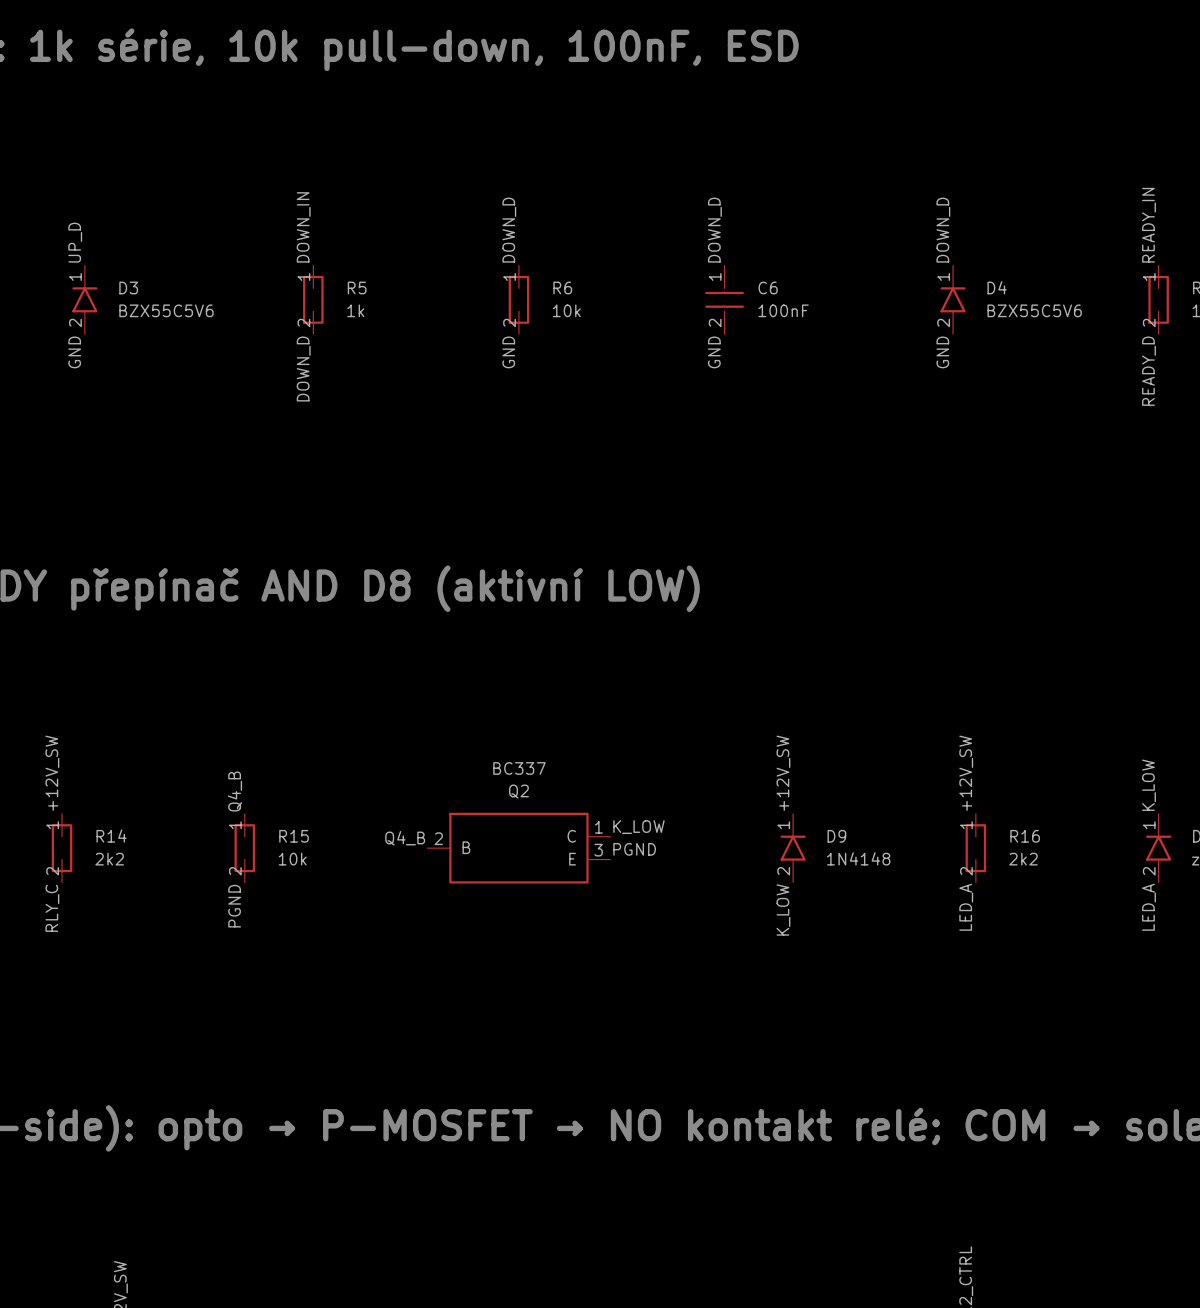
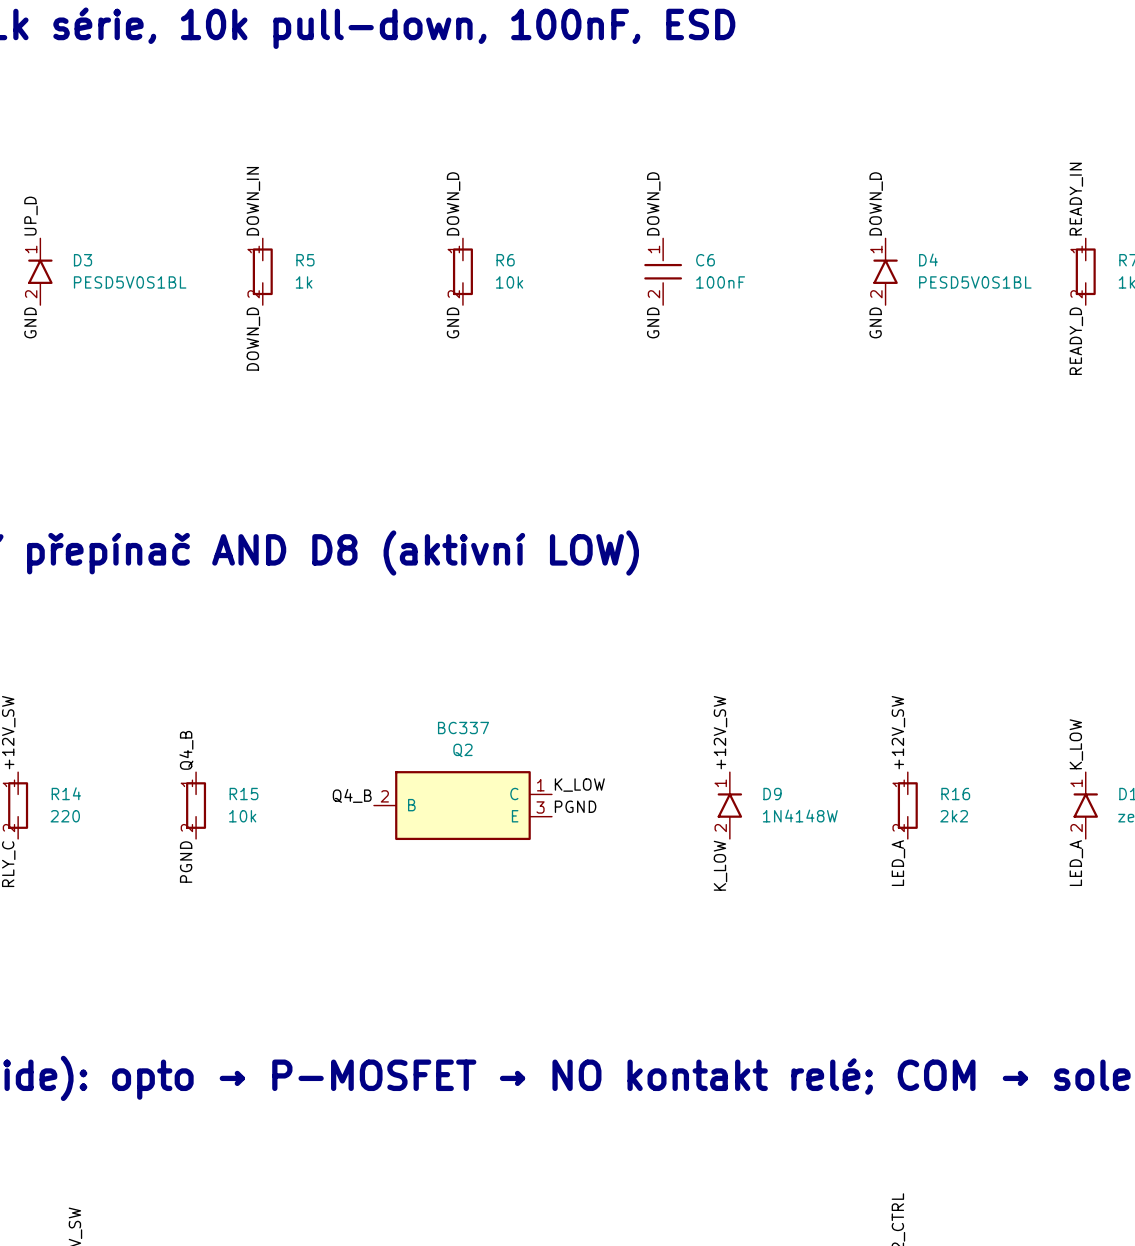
D3 value: BZX55C5V6 (166, 310) -> PESD5V0S1BL (130, 282)
D4 value: BZX55C5V6 (1034, 310) -> PESD5V0S1BL (975, 282)
D9 value: 1N4148 (858, 858) -> 1N4148W (800, 815)
R14 value: 2k2 (109, 859) -> 220 (65, 816)

